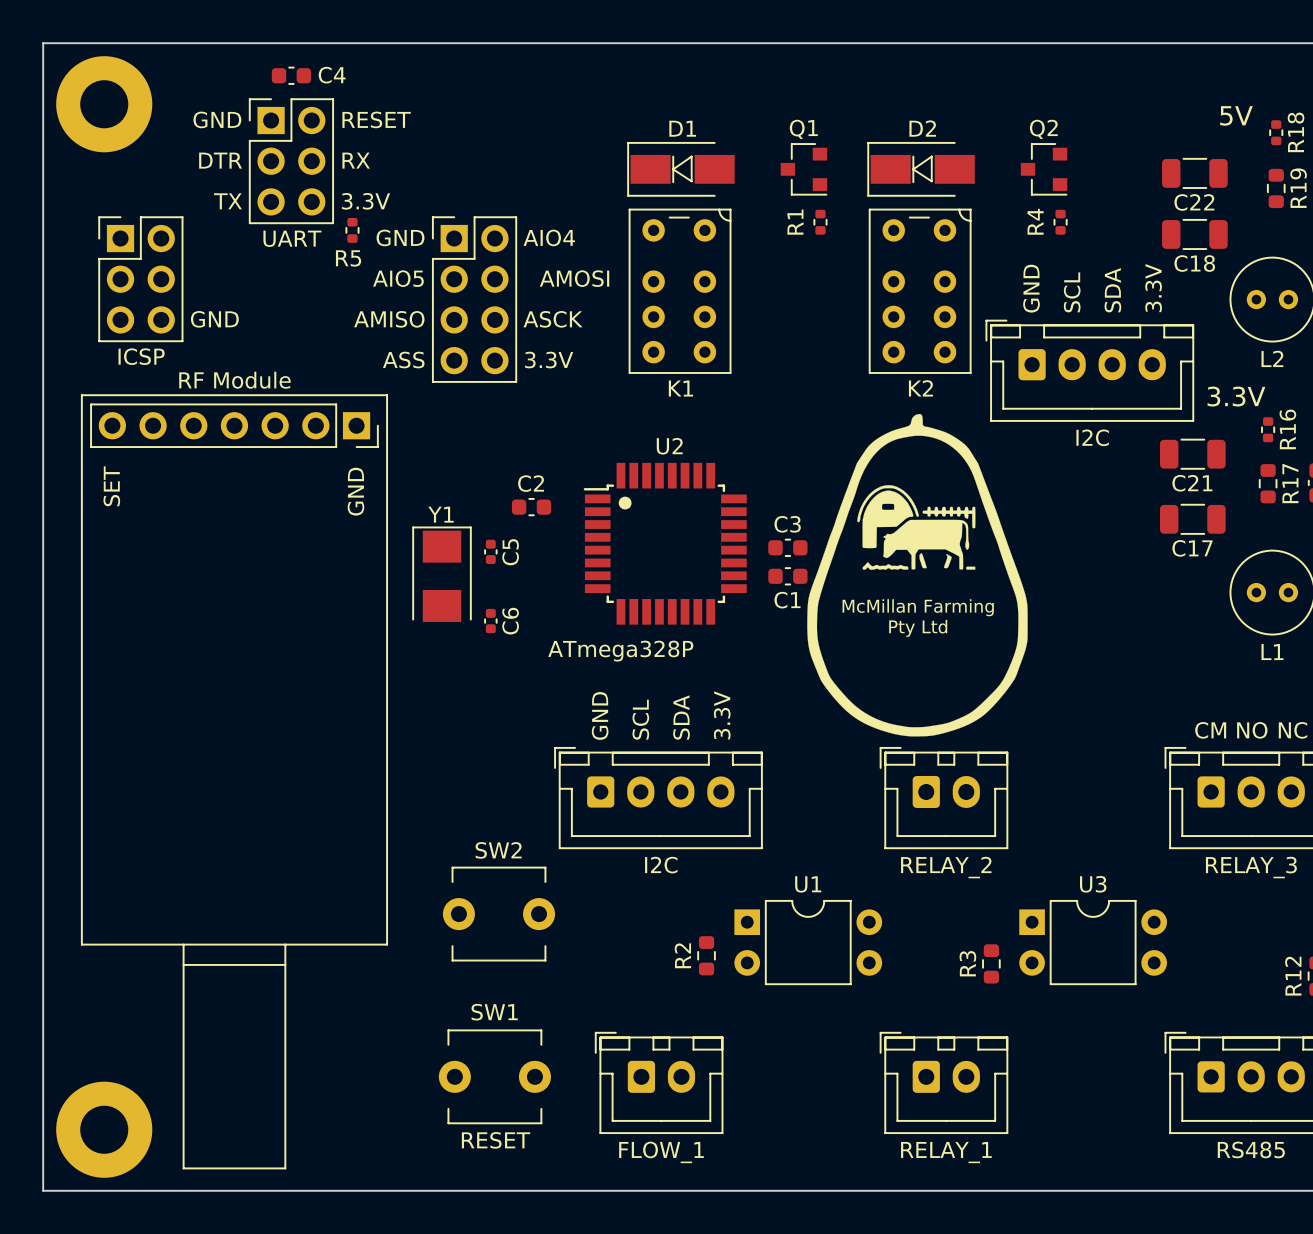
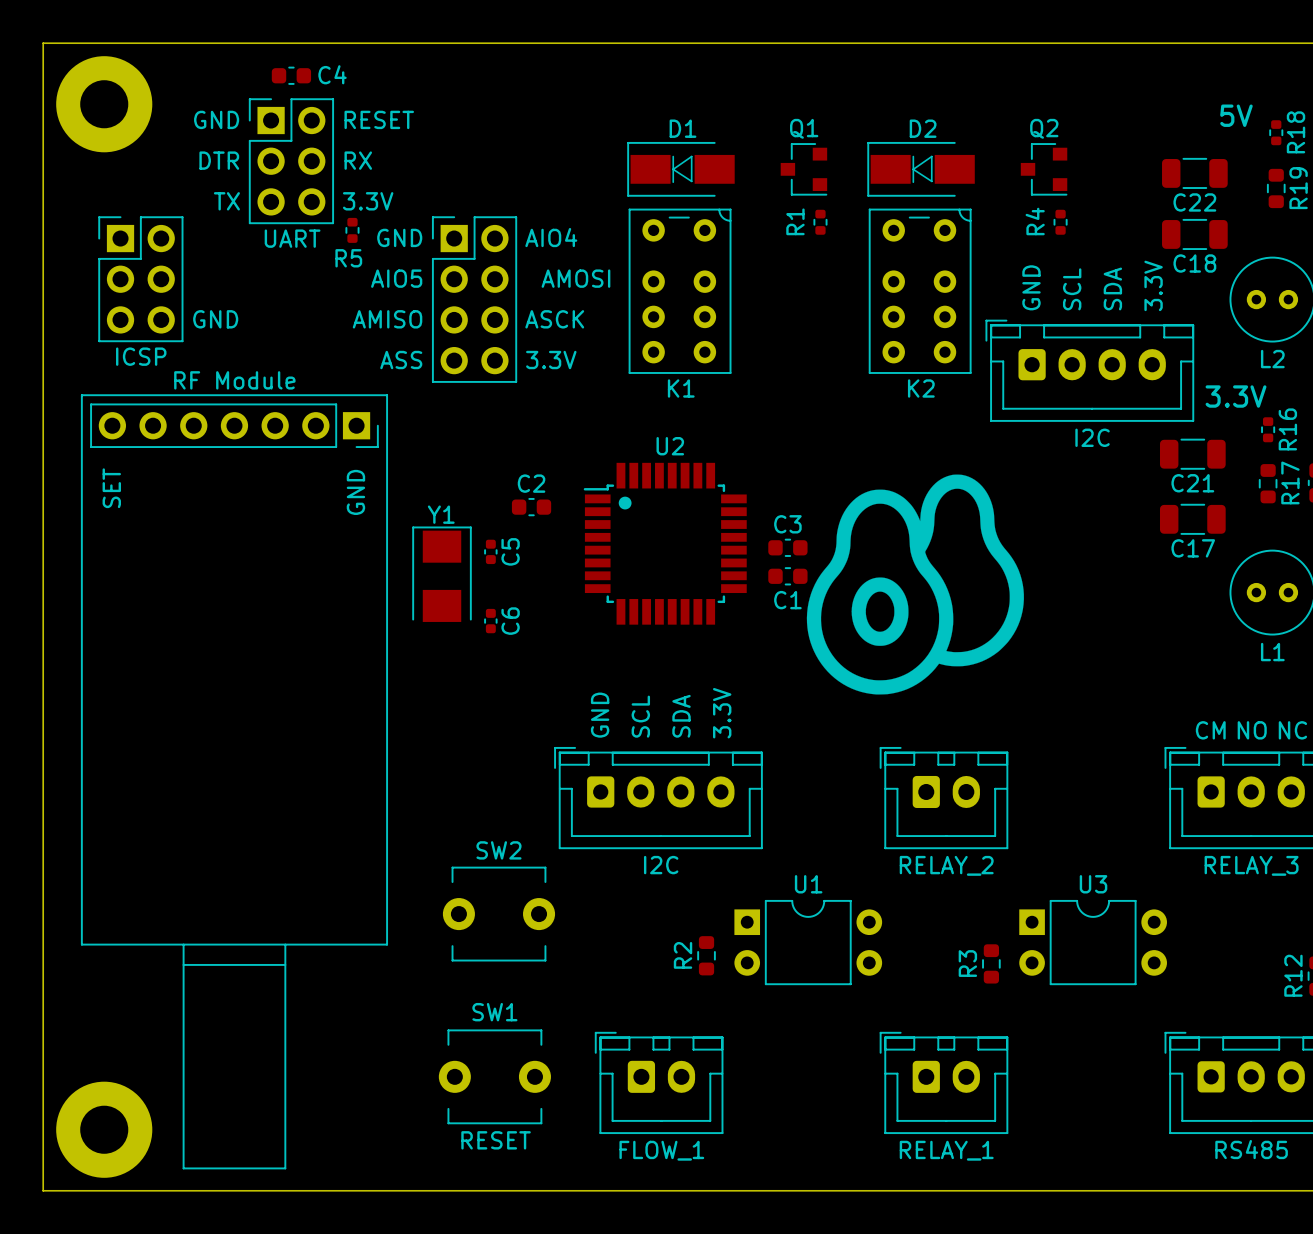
drawing shape: [807, 413, 1028, 737] -> [806, 474, 1024, 695]
text: McMillan Farming (918, 607) -> none
text: Pty Ltd (918, 628) -> none
U2 value: ATmega328P (620, 651) -> none

